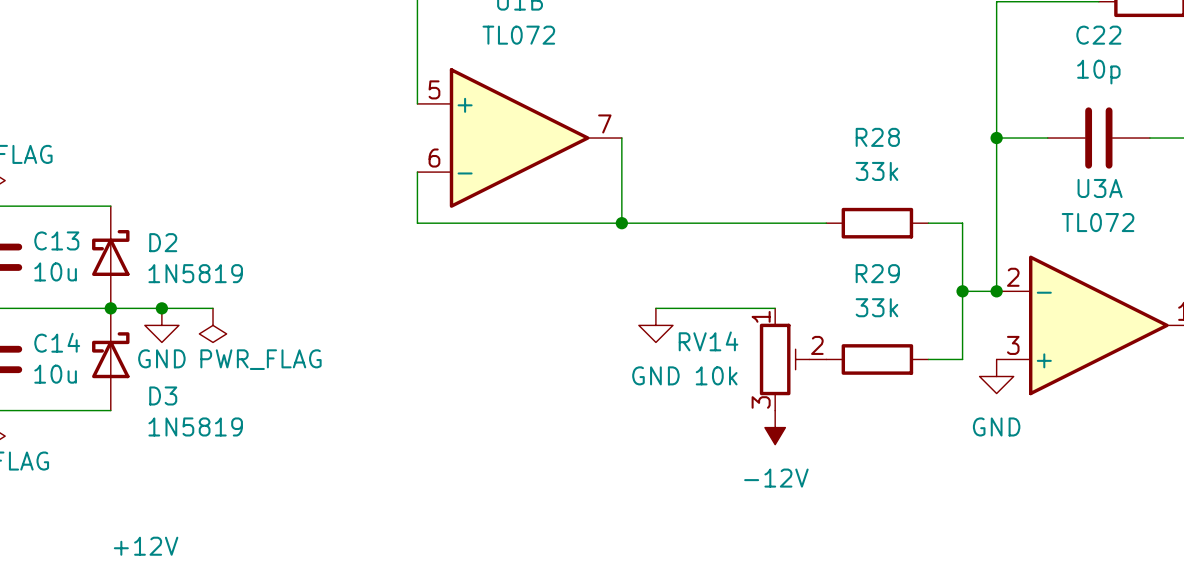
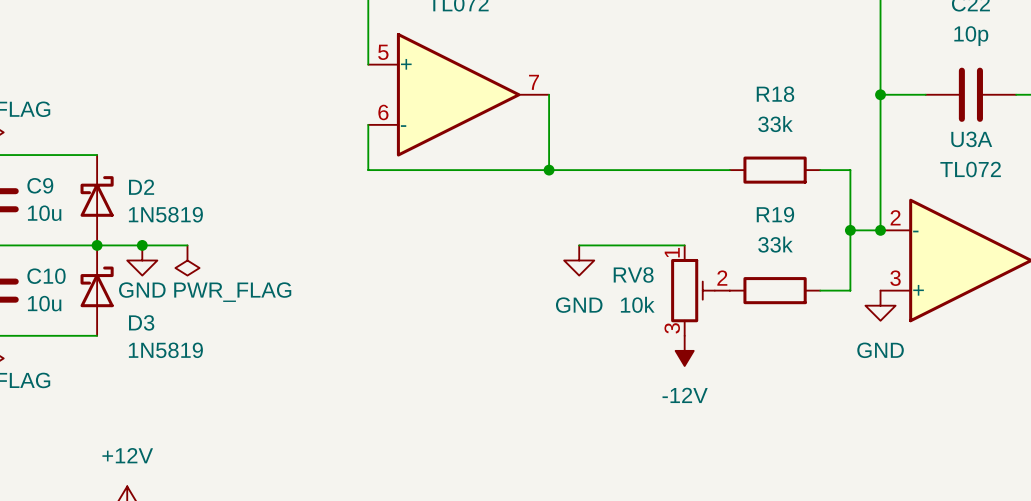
R28 name: R28 (877, 137) -> R18 (775, 94)
C13 name: C13 (56, 240) -> C9 (40, 185)
R29 name: R29 (877, 273) -> R19 (775, 214)
RV14 name: RV14 (708, 341) -> RV8 (633, 274)
C14 name: C14 (57, 342) -> C10 (46, 276)

